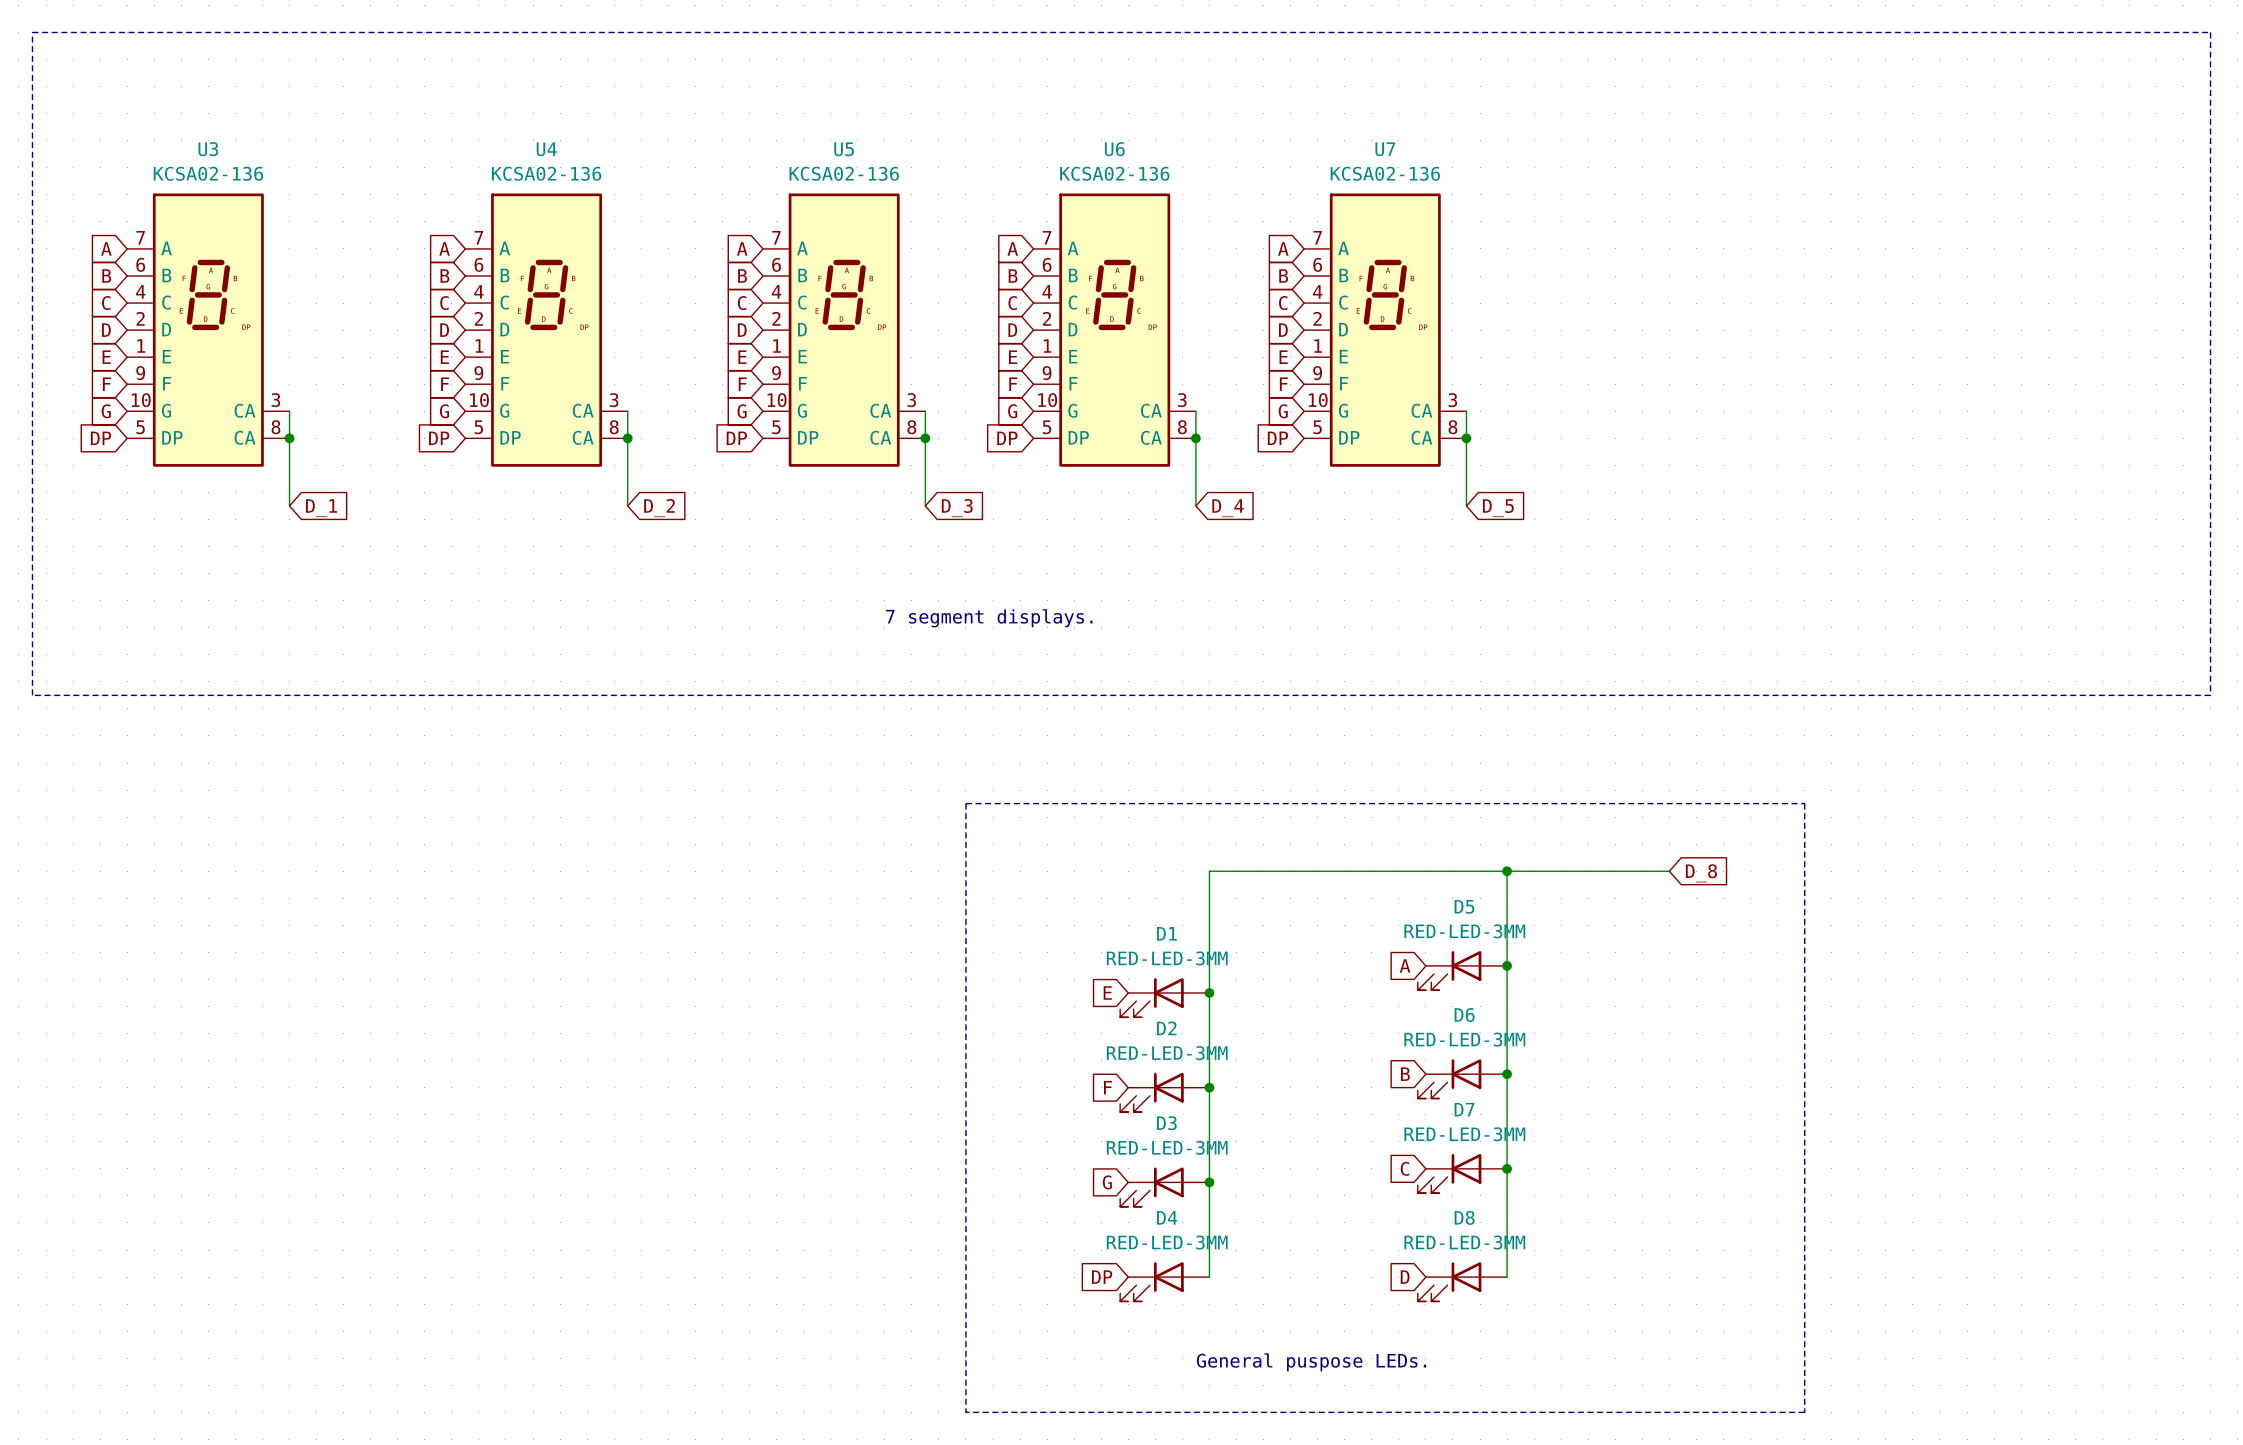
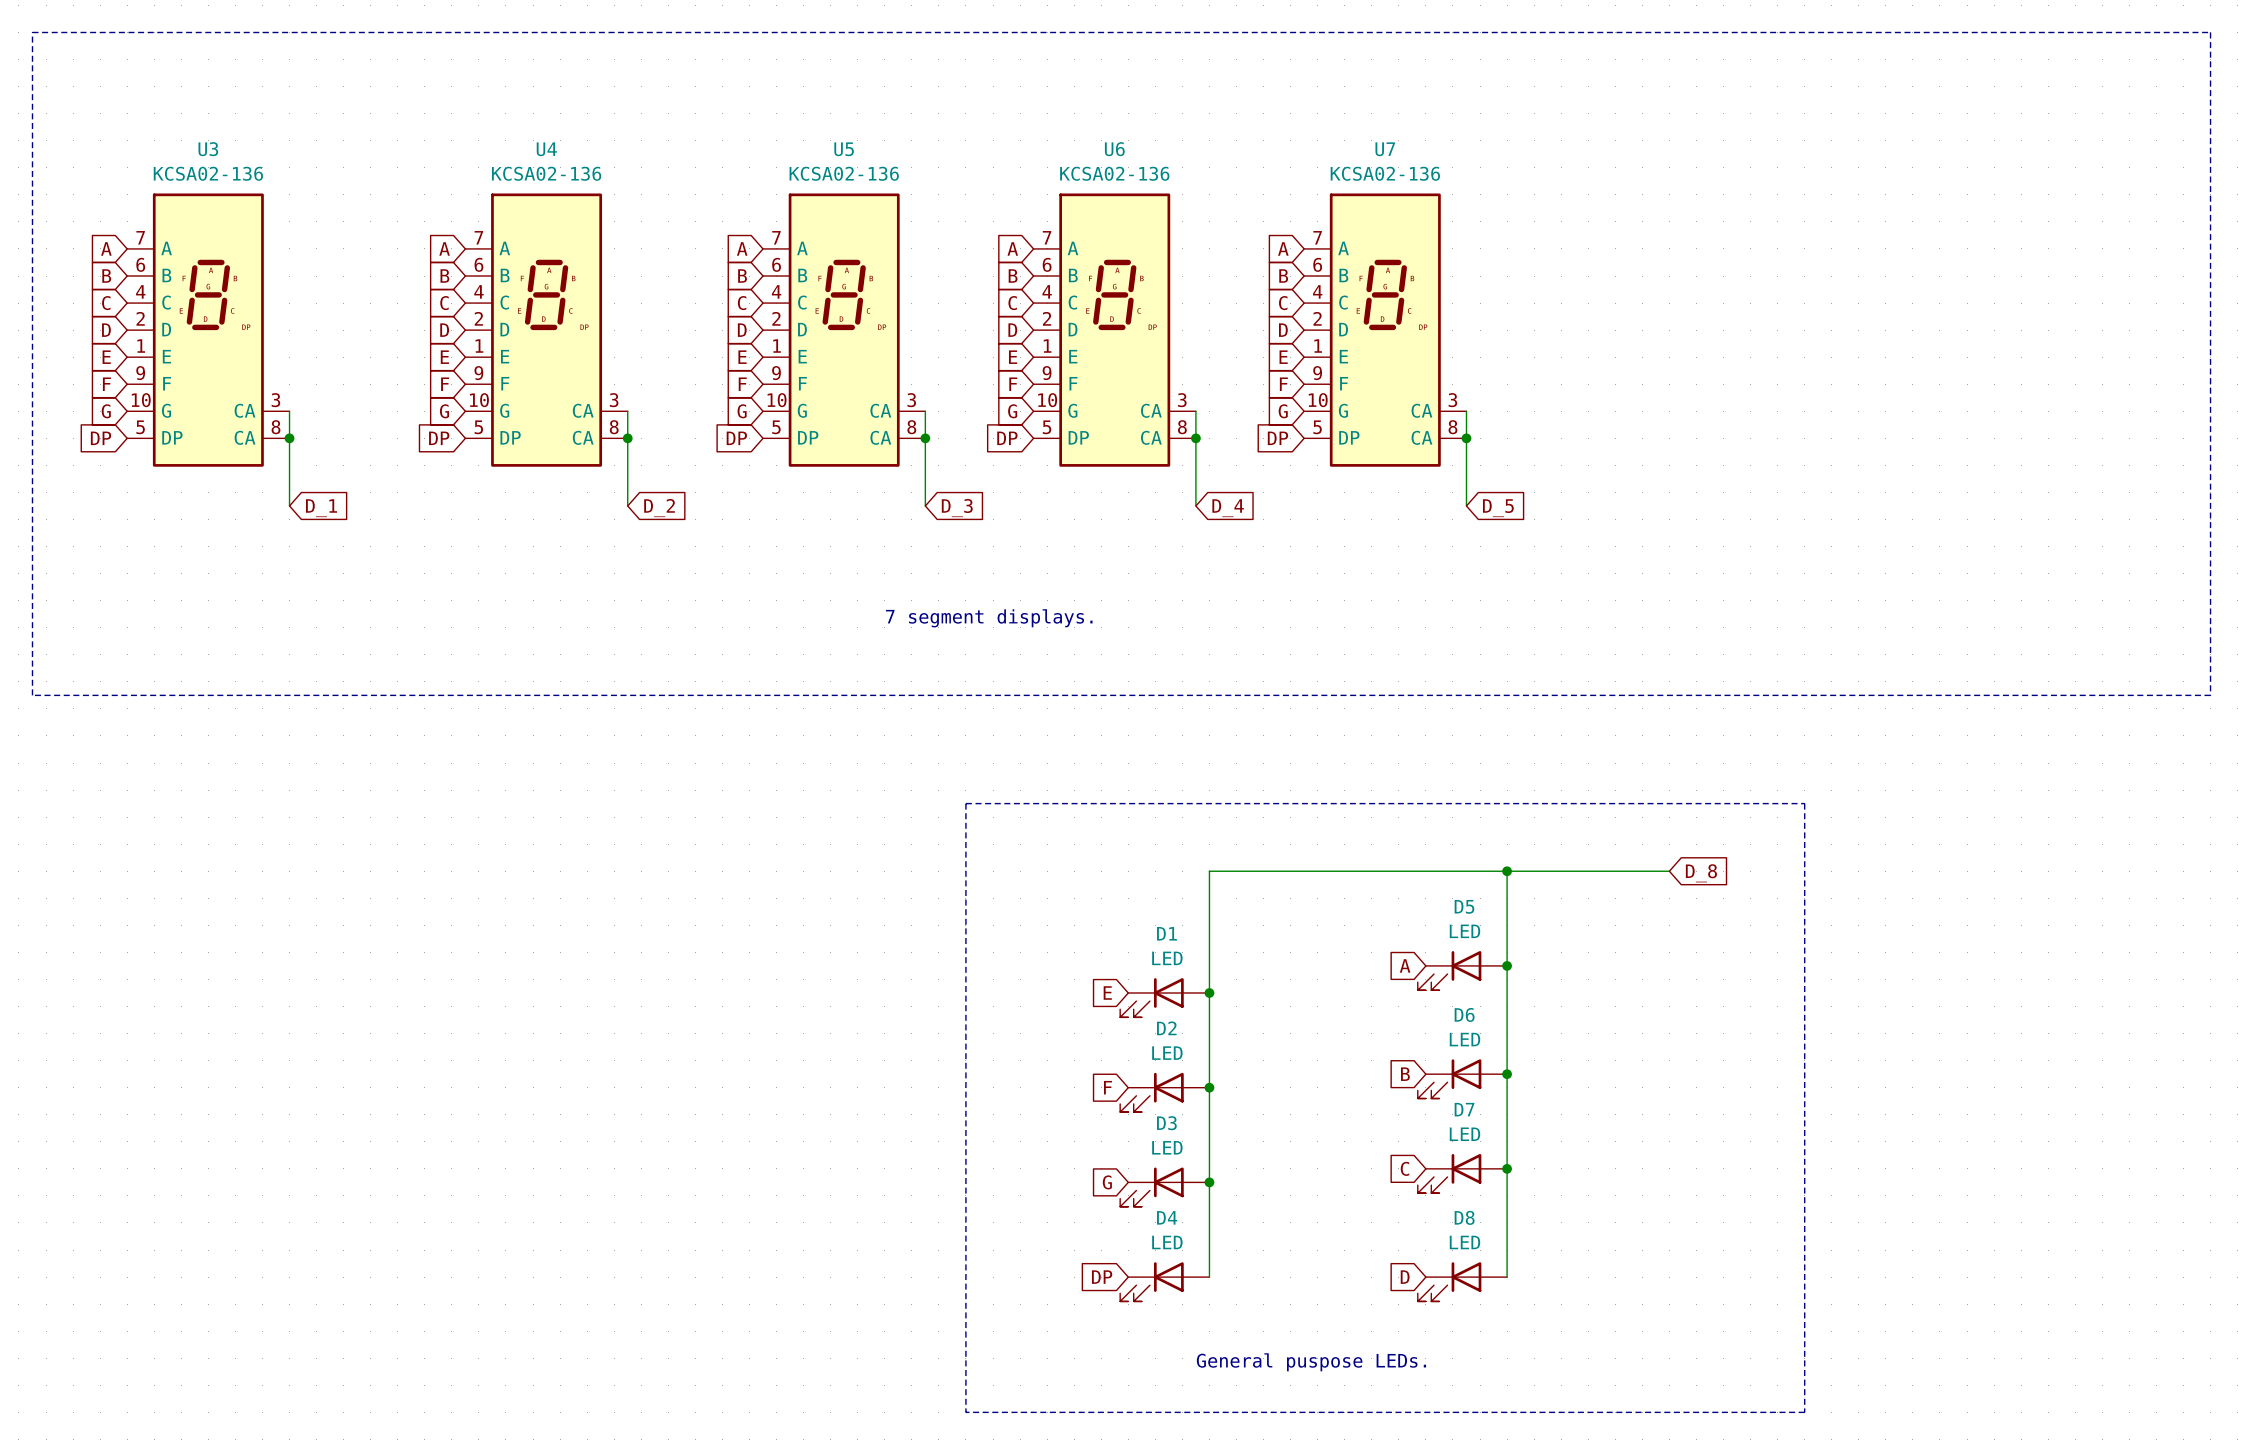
D5 value: RED-LED-3MM (1464, 931) -> LED (1464, 931)
D1 value: RED-LED-3MM (1167, 958) -> LED (1167, 958)
D6 value: RED-LED-3MM (1464, 1039) -> LED (1464, 1039)
D2 value: RED-LED-3MM (1167, 1053) -> LED (1167, 1053)
D7 value: RED-LED-3MM (1464, 1134) -> LED (1464, 1134)
D3 value: RED-LED-3MM (1167, 1147) -> LED (1167, 1147)
D4 value: RED-LED-3MM (1167, 1242) -> LED (1167, 1242)
D8 value: RED-LED-3MM (1464, 1242) -> LED (1464, 1242)

